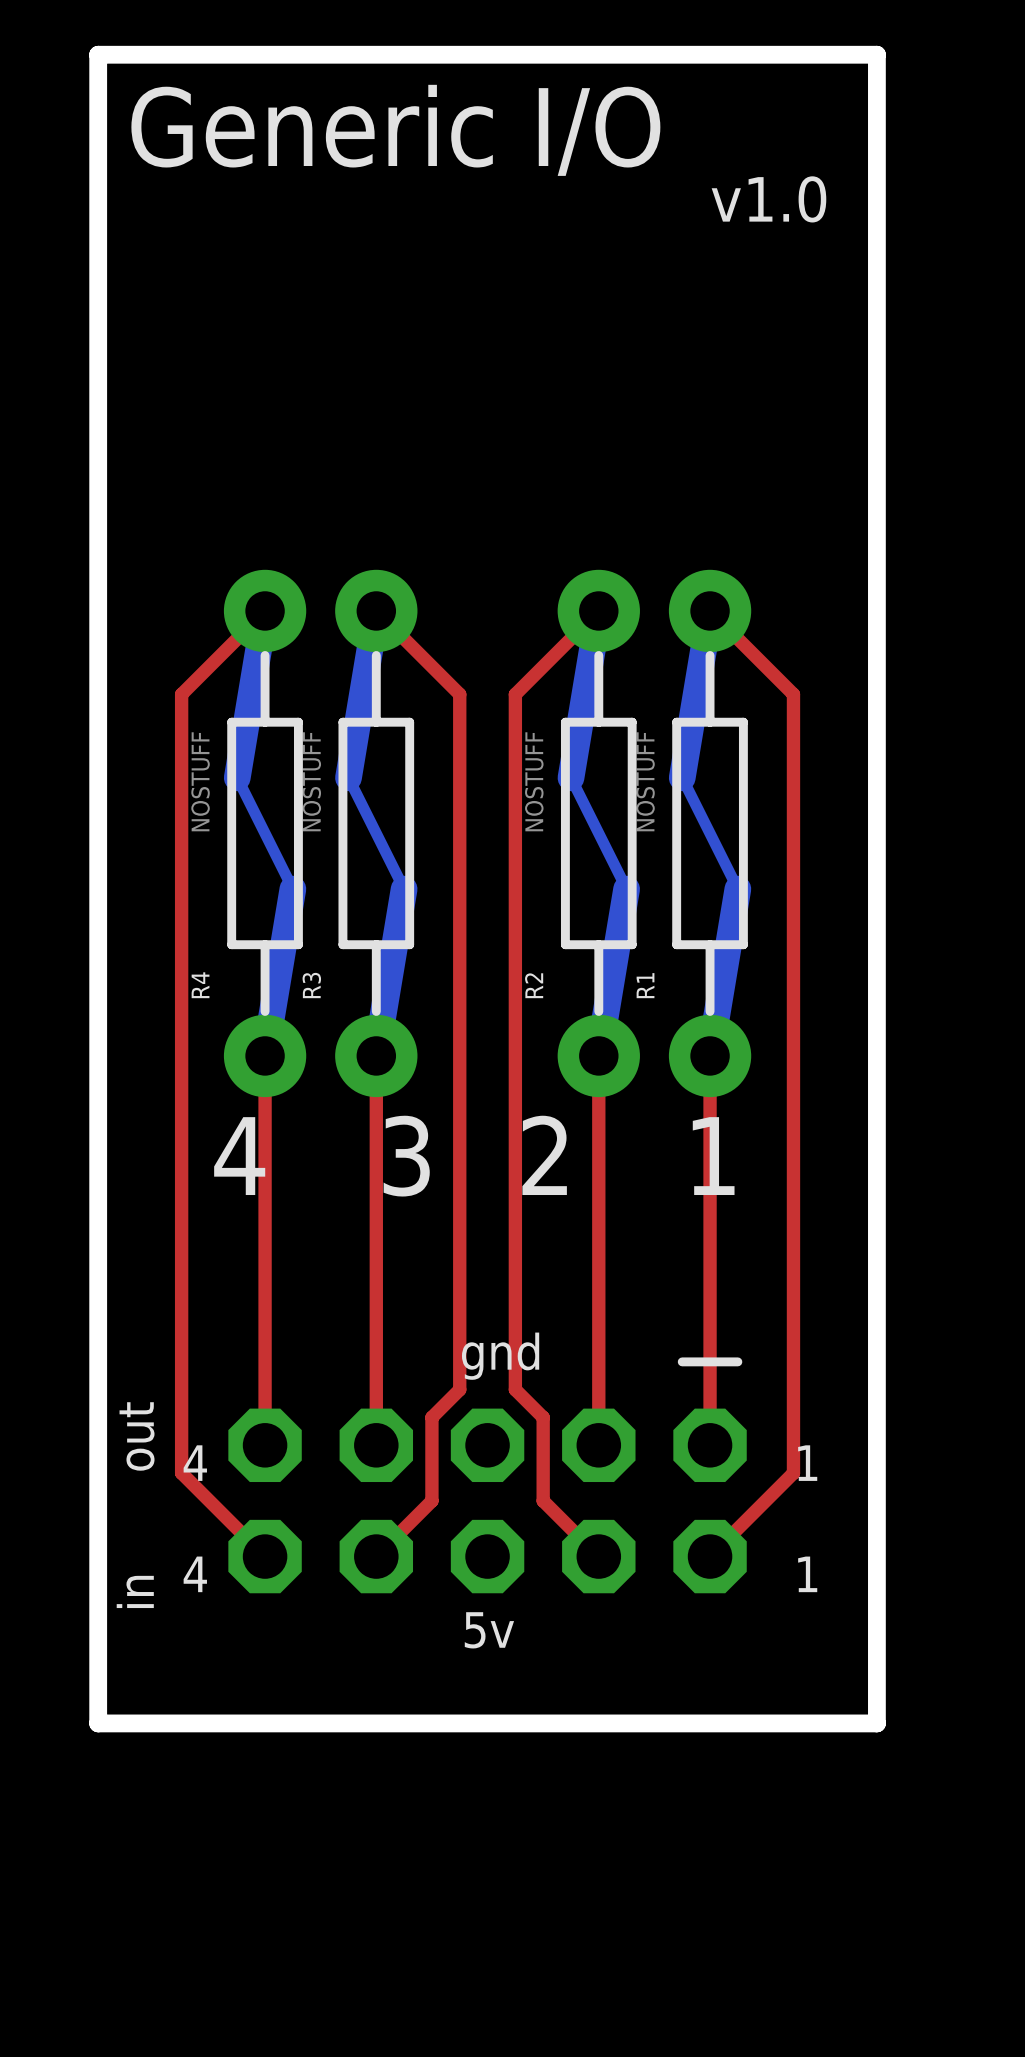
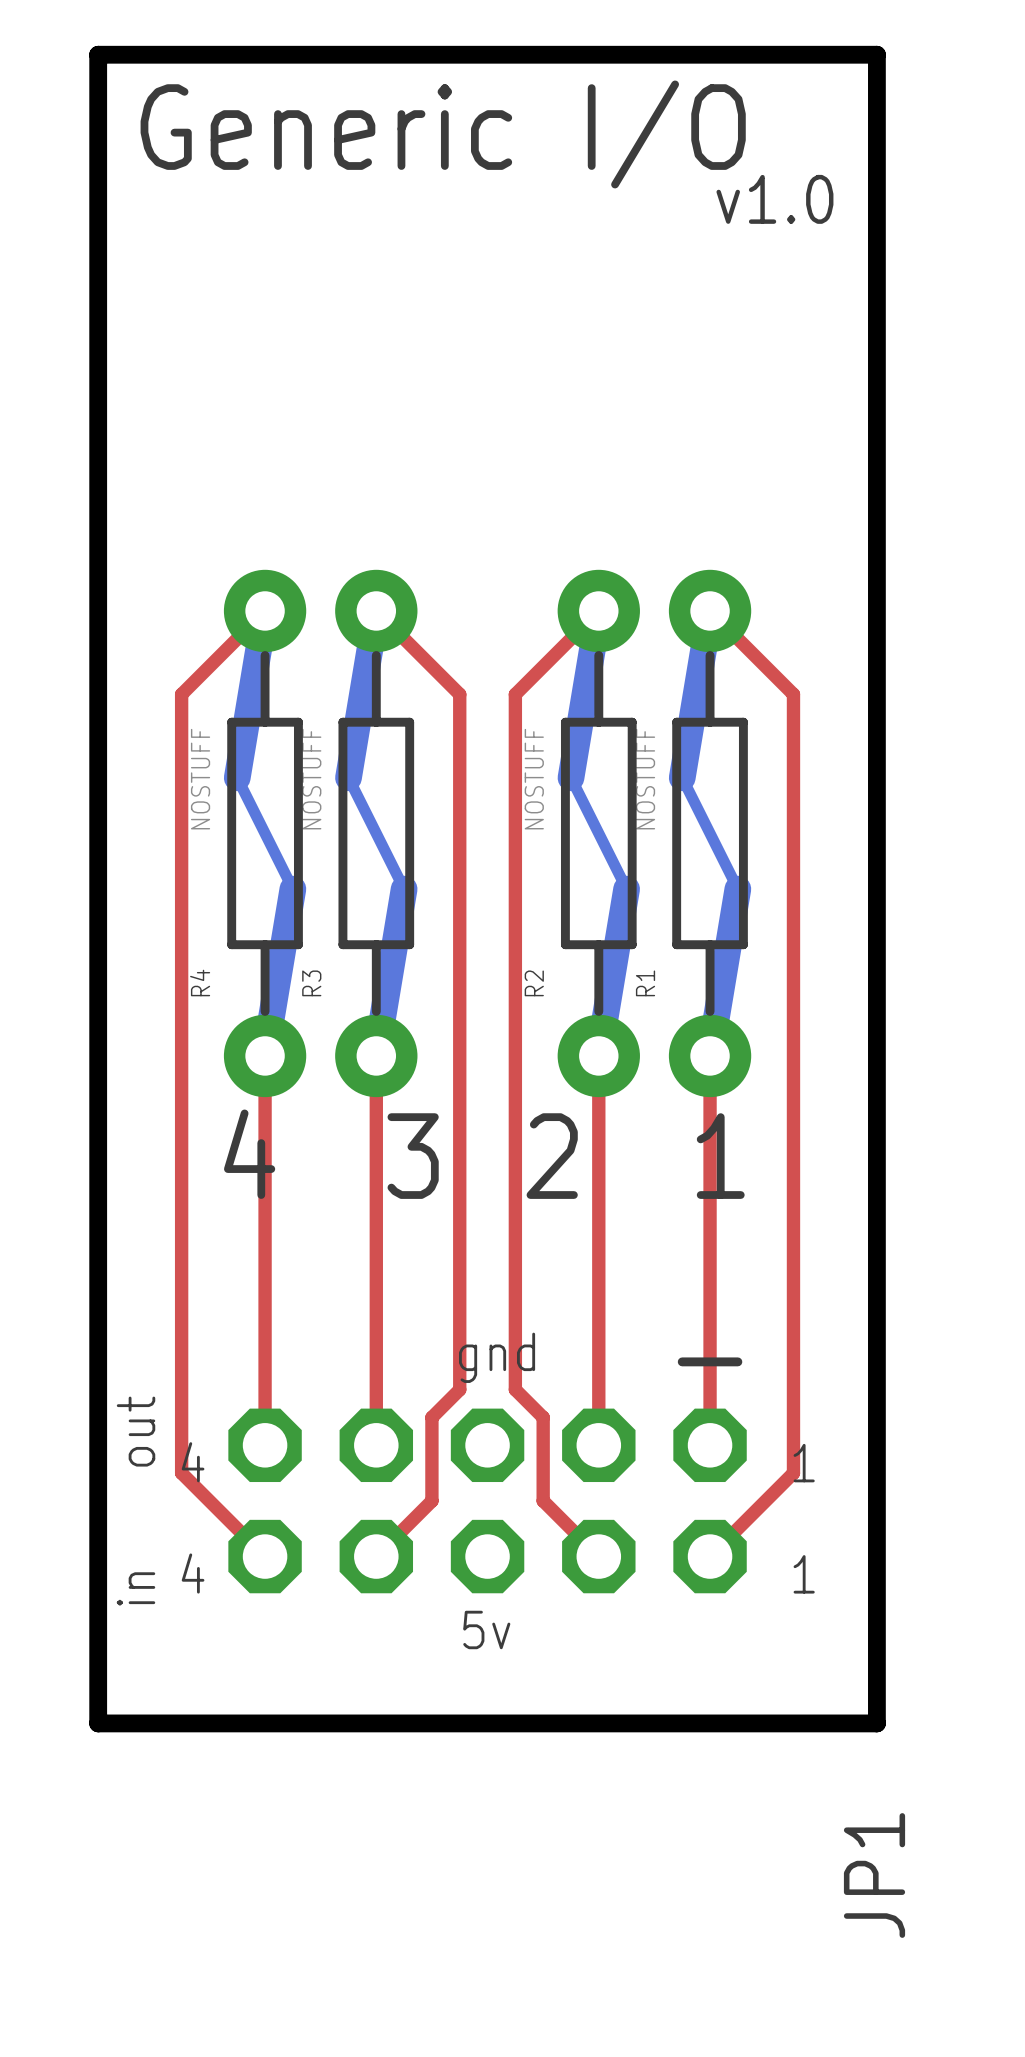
JP1 name: none -> JP1 (874, 1875)

